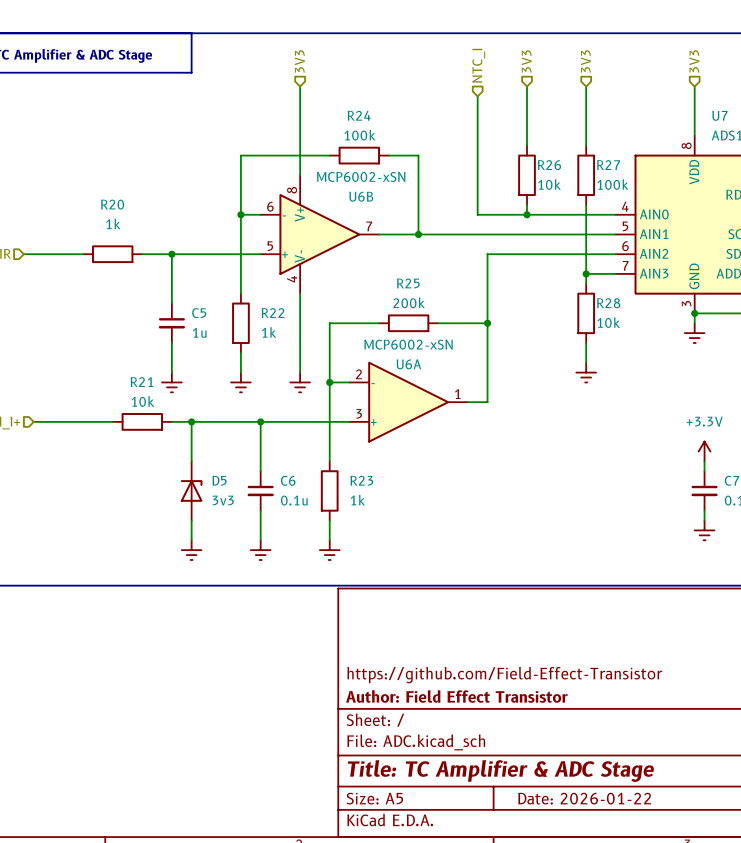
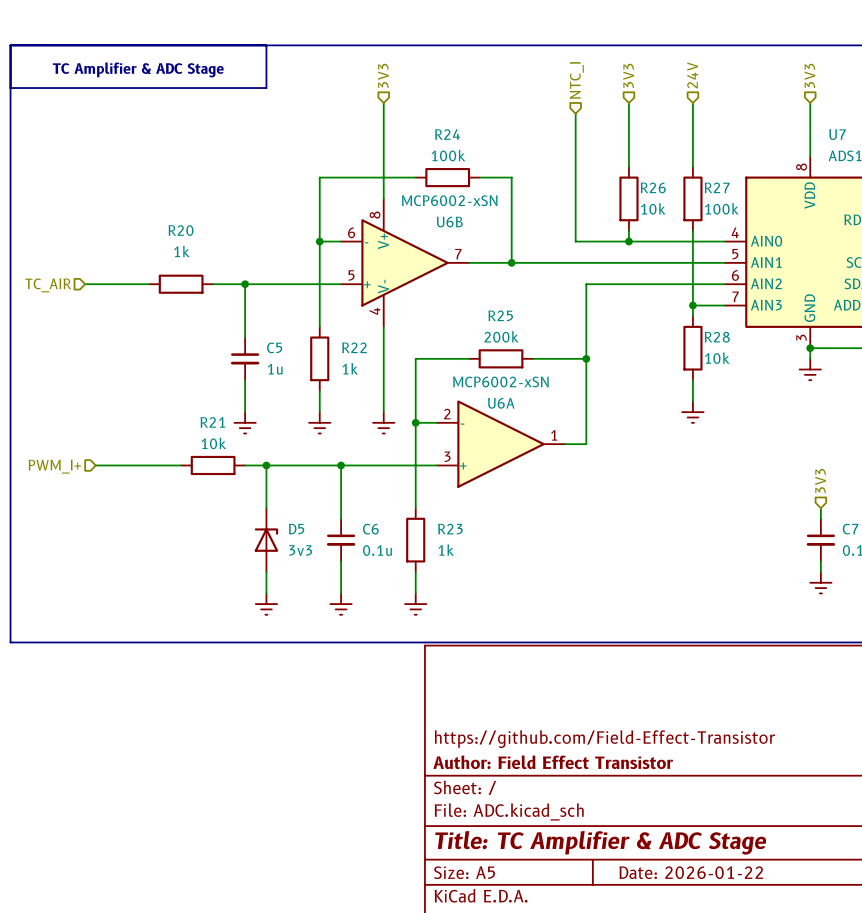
hierarchical label: 3V3 (585, 61) -> 24V (692, 75)
hierarchical label: none -> 3V3 (820, 481)
power symbol: +3.3V (704, 451) -> none

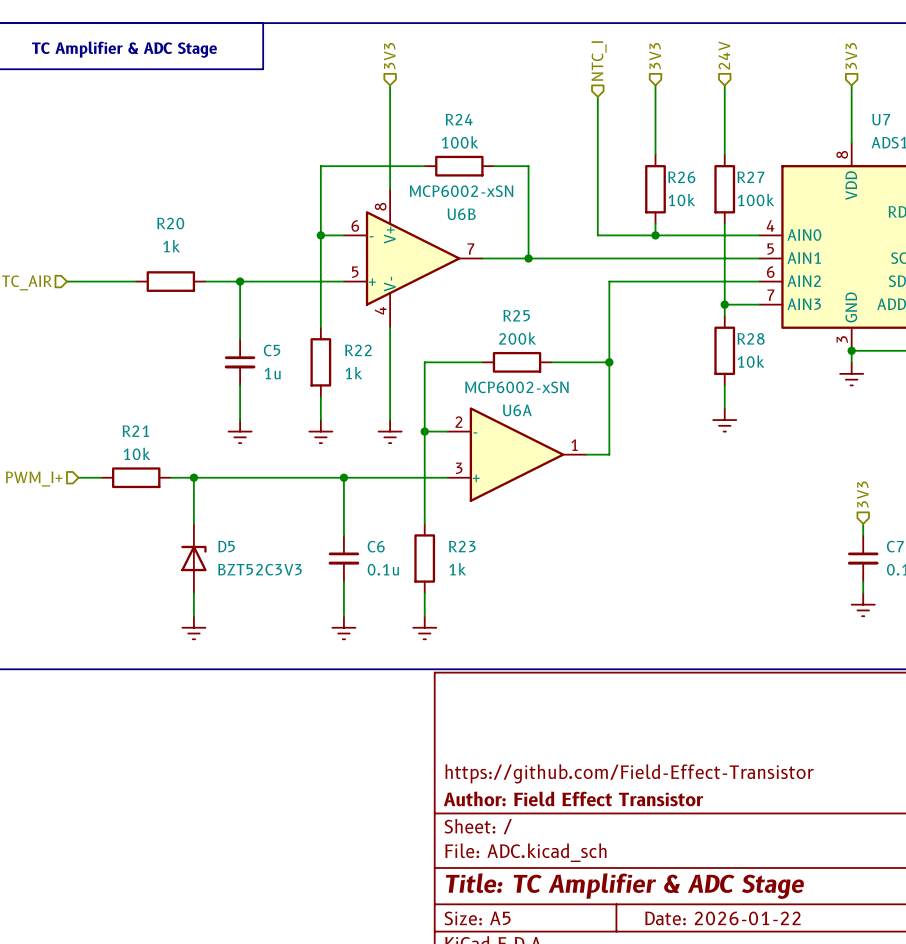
wire: (117, 465) (181, 465) -> (240, 477) (170, 477)
junction: none -> (193, 477)
R21 position: (213, 465) -> (136, 477)
wire: (266, 465) (266, 508) -> (193, 477) (193, 523)
junction: (266, 465) -> none
D5 position: (266, 540) -> (193, 558)
D5 value: 3v3 (300, 550) -> BZT52C3V3 (259, 569)
wire: (266, 572) (266, 593) -> (193, 593) (193, 616)
power symbol position: (266, 604) -> (193, 627)

